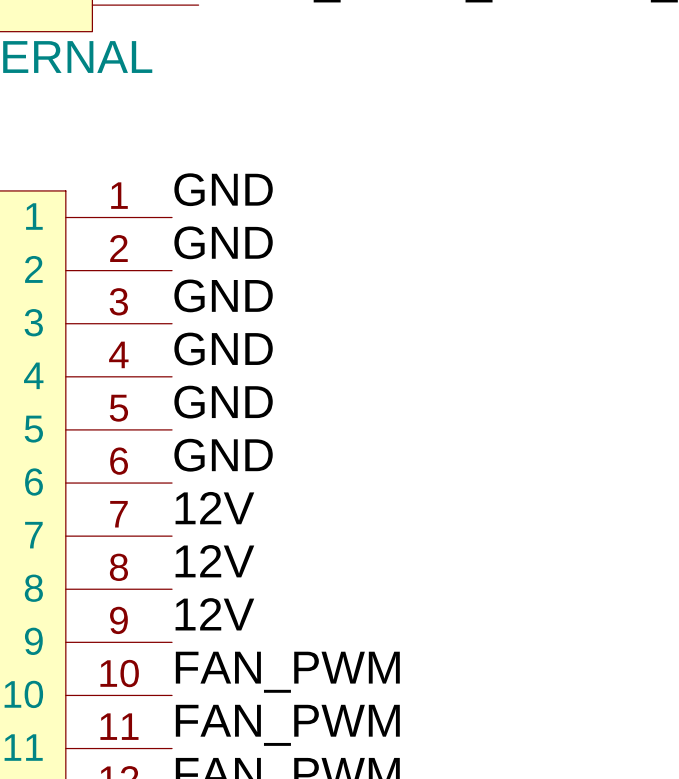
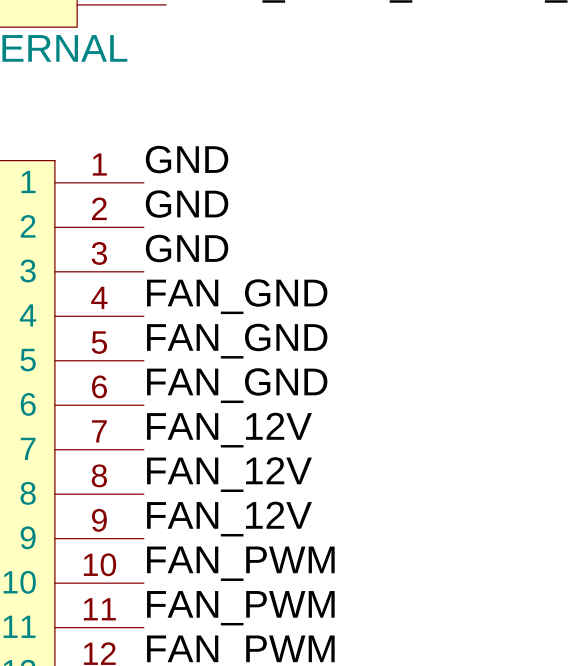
label: GND (223, 349) -> FAN_GND (237, 296)
label: GND (223, 402) -> FAN_GND (237, 341)
label: GND (223, 455) -> FAN_GND (237, 385)
label: 12V (214, 508) -> FAN_12V (229, 430)
label: 12V (214, 561) -> FAN_12V (229, 474)
label: 12V (214, 614) -> FAN_12V (229, 519)

